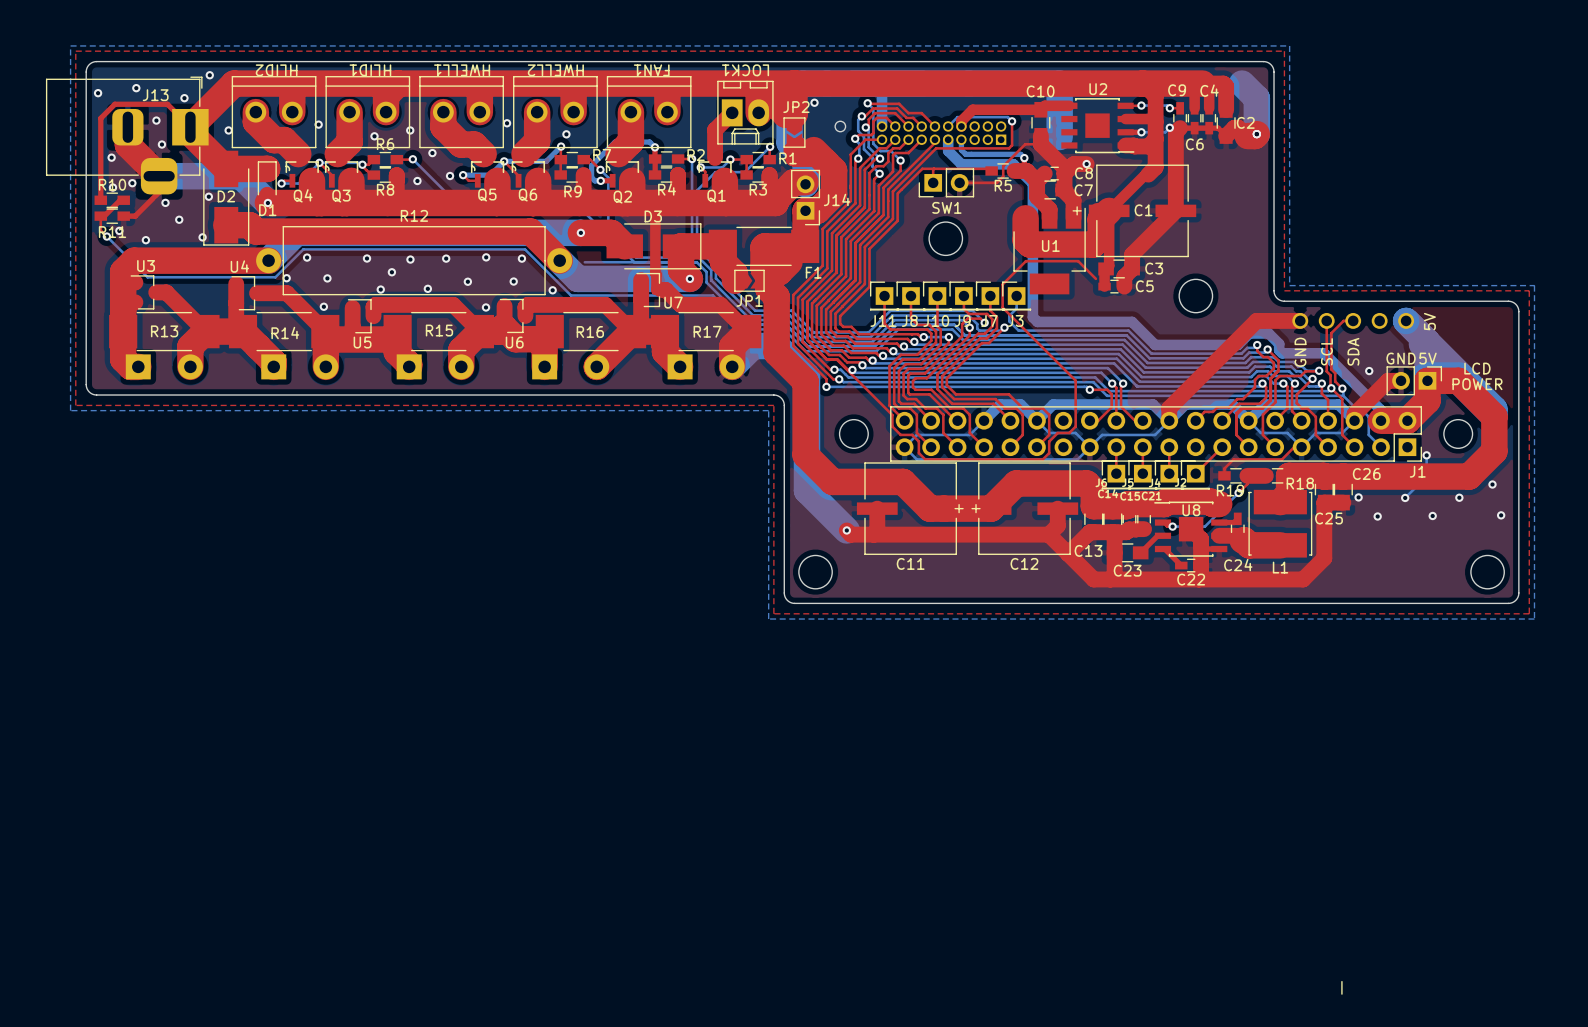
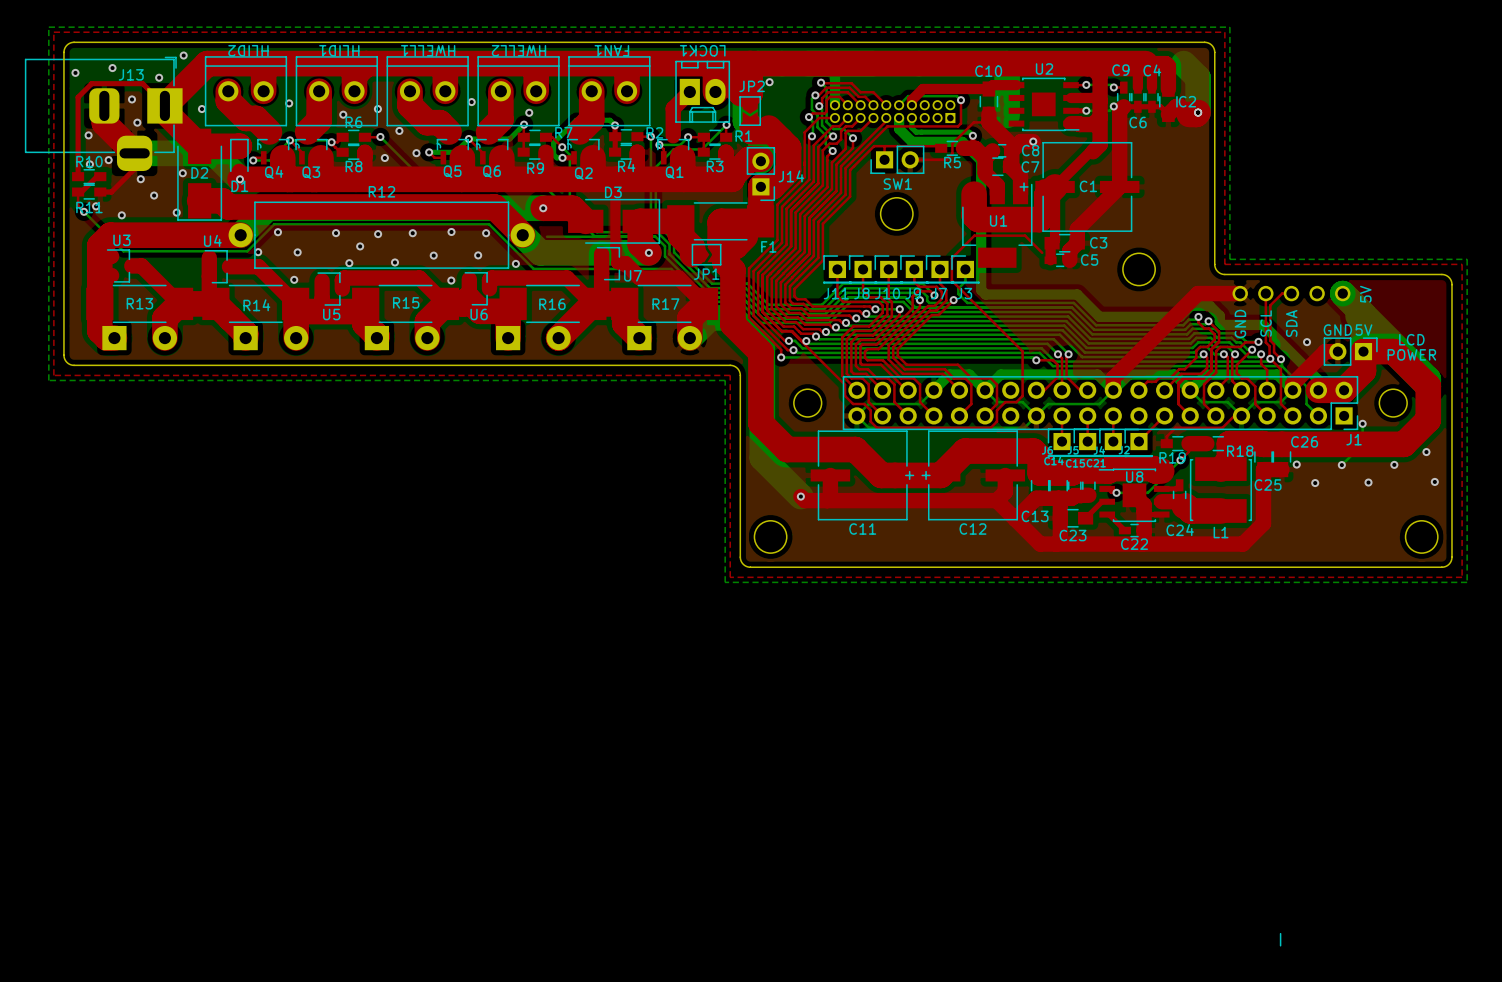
round board edge: [834, 120, 847, 133] -> none

